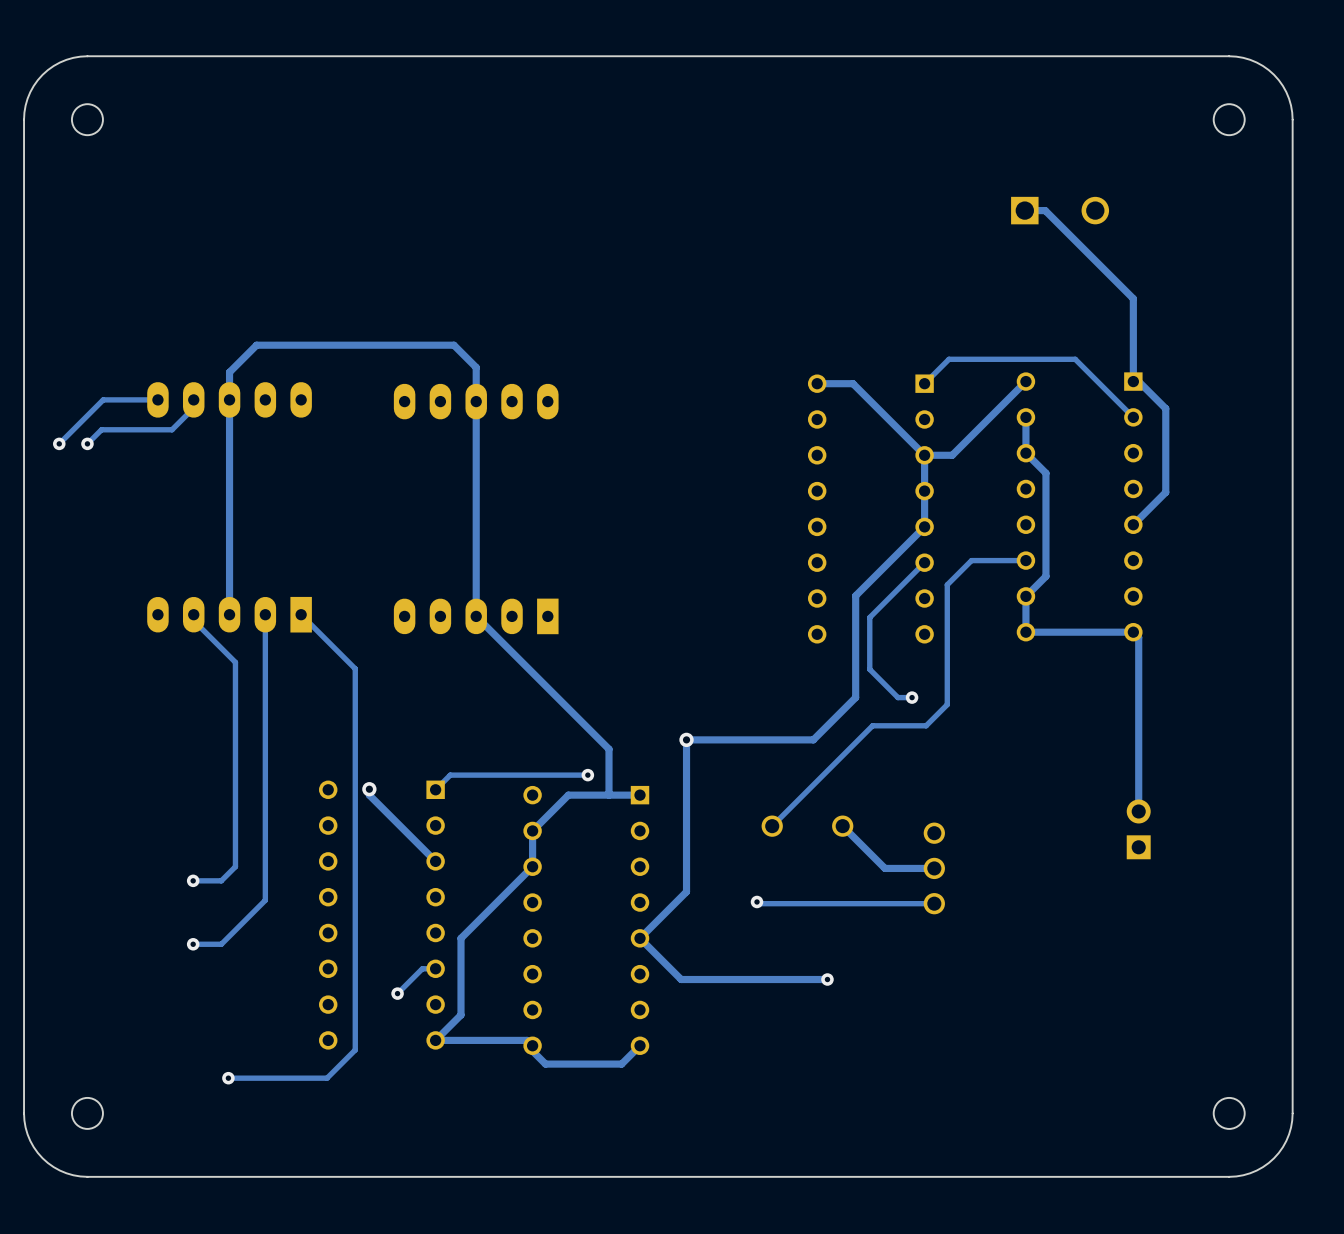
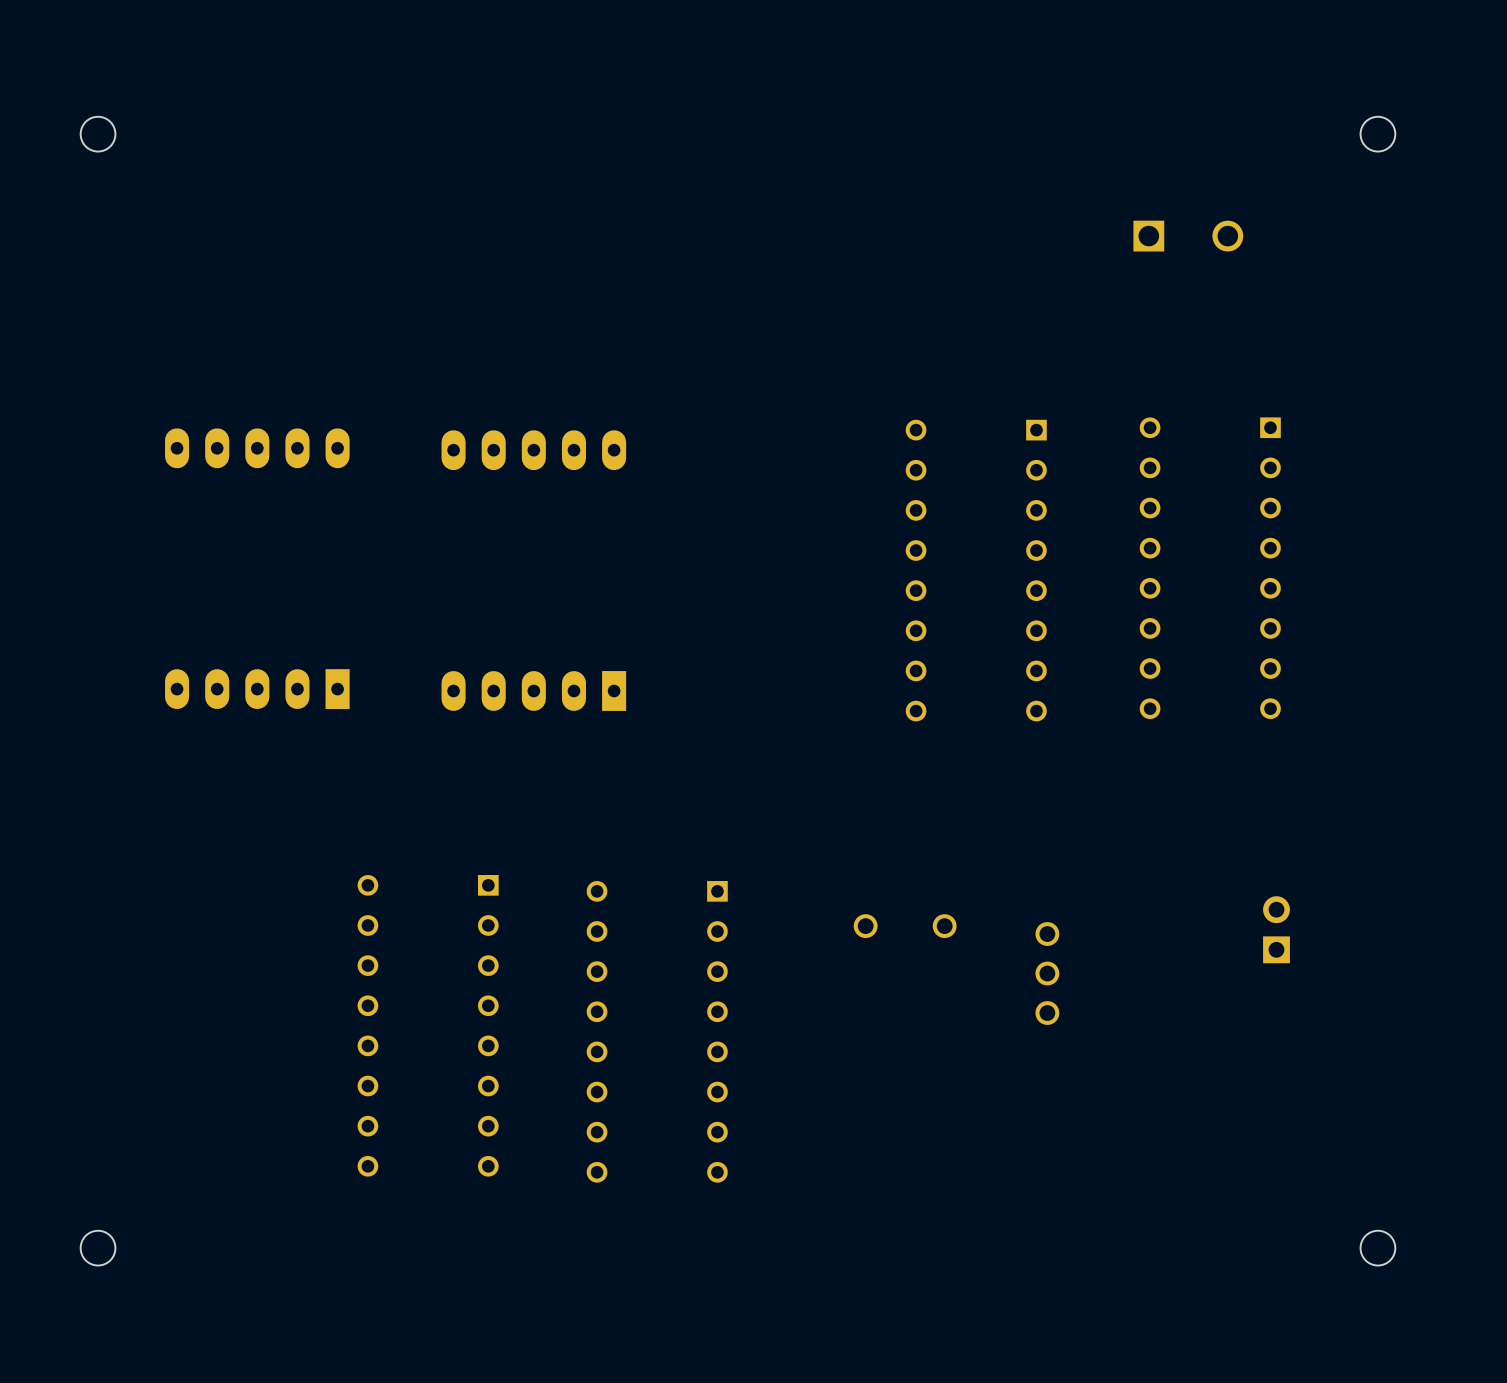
board edge: (1229, 56) (87, 56) (66, 59) (53, 65) (42, 74) (30, 92) (25, 105) (24, 119) (24, 1113) (27, 1134) (33, 1147) (42, 1158) (53, 1167) (66, 1173) (87, 1176) (1229, 1176) (1243, 1175) (1256, 1170) (1274, 1158) (1282, 1147) (1289, 1134) (1292, 1113) (1292, 119) (1291, 105) (1286, 92) (1274, 74) (1262, 65) (1250, 59) (1229, 56) -> none
track: (1024, 210) (1045, 210) (1133, 298) (1133, 381) (1138, 381) (1165, 408) (1165, 492) (1133, 524) -> none
track: (1025, 381) (952, 455) (924, 455) -> none
track: (817, 383) (852, 383) (924, 455) -> none
track: (924, 383) (948, 359) (1075, 359) (1133, 417) -> none
track: (157, 399) (103, 399) (59, 443) -> none
track: (193, 399) (193, 408) (172, 429) (101, 429) (87, 443) -> none
track: (1025, 417) (1025, 453) (1045, 473) (1045, 576) (1025, 596) (1025, 632) (1133, 632) (1138, 637) (1138, 811) -> none
via: (59, 443) -> none
via: (87, 443) -> none
track: (924, 455) (924, 526) (855, 595) (855, 697) (813, 739) (686, 739) (686, 891) (640, 938) (681, 979) (827, 979) -> none
track: (1025, 560) (971, 560) (947, 584) (947, 704) (926, 725) (872, 725) (772, 826) -> none
track: (924, 562) (869, 617) (869, 669) (897, 697) (912, 697) -> none
track: (193, 614) (193, 620) (235, 662) (235, 866) (221, 880) (193, 880) -> none
track: (229, 614) (229, 372) (256, 345) (453, 345) (476, 367) (476, 616) (609, 749) (609, 795) -> none
track: (265, 614) (265, 900) (221, 944) (193, 944) -> none
track: (301, 614) (355, 668) (355, 1049) (327, 1078) (228, 1078) -> none
via: (912, 697) -> none
via: (686, 739) -> none
track: (587, 775) (450, 775) (435, 789) -> none
via: (587, 775) -> none
track: (369, 789) (369, 795) (435, 861) -> none
via: (369, 789) -> none
track: (640, 795) (568, 795) (532, 830) (532, 866) (460, 938) (460, 1015) (435, 1040) (527, 1040) (532, 1045) (532, 1051) (545, 1064) (621, 1064) (640, 1045) -> none
track: (842, 826) (884, 868) (934, 868) -> none
via: (193, 880) -> none
track: (757, 901) (758, 903) (934, 903) -> none
via: (757, 901) -> none
via: (193, 944) -> none
track: (435, 968) (422, 968) (397, 993) -> none
via: (827, 979) -> none
via: (397, 993) -> none
via: (228, 1078) -> none

